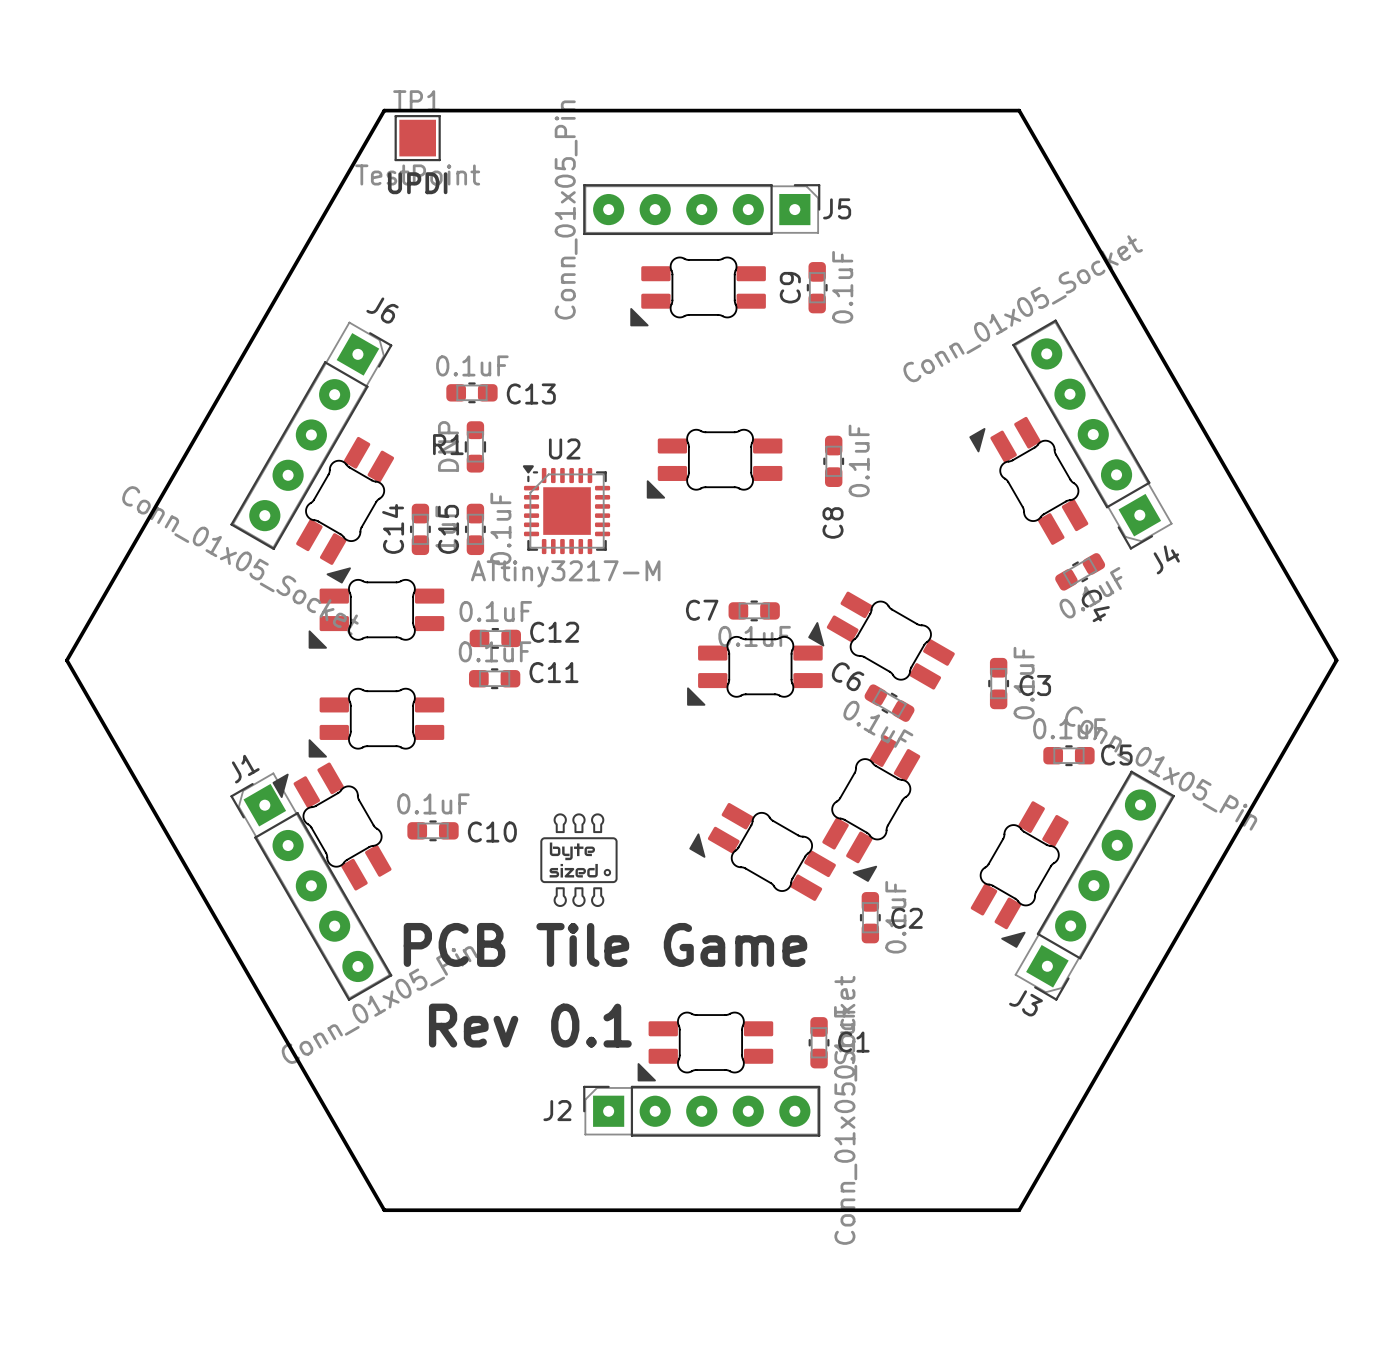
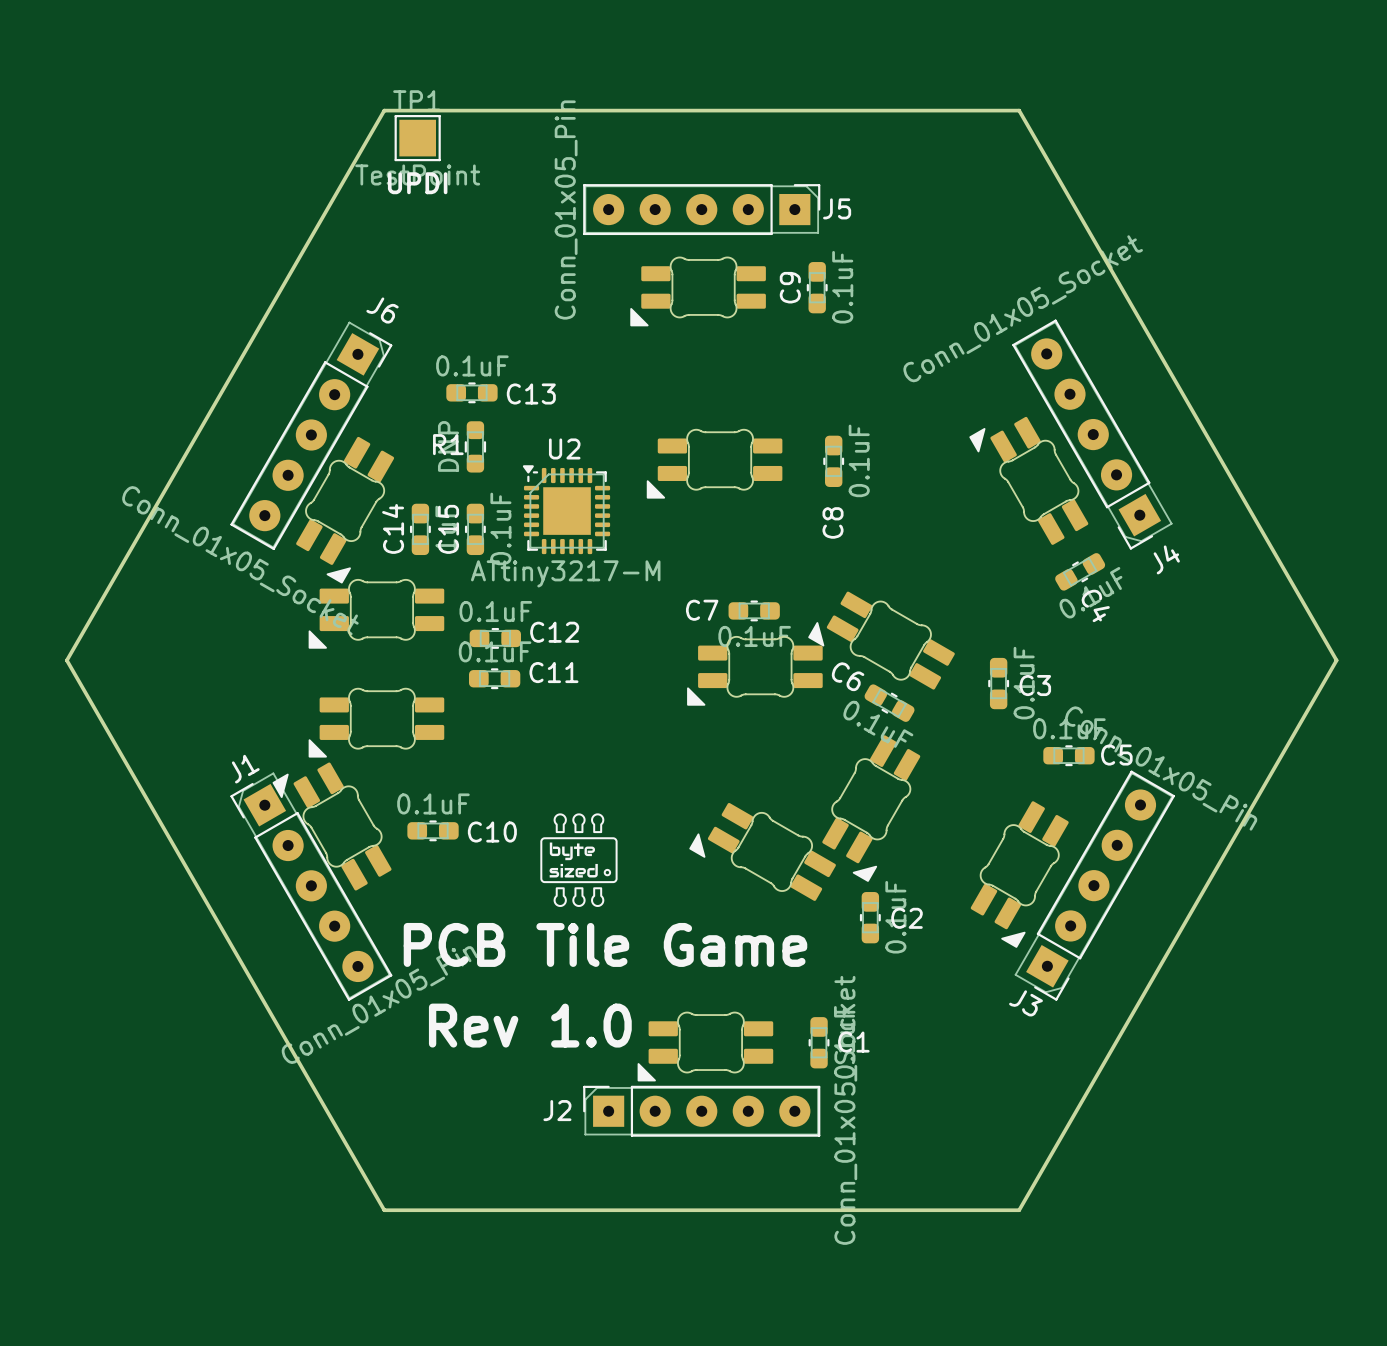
text: Rev 0.1 (530, 1025) -> Rev 1.0 (530, 1025)

